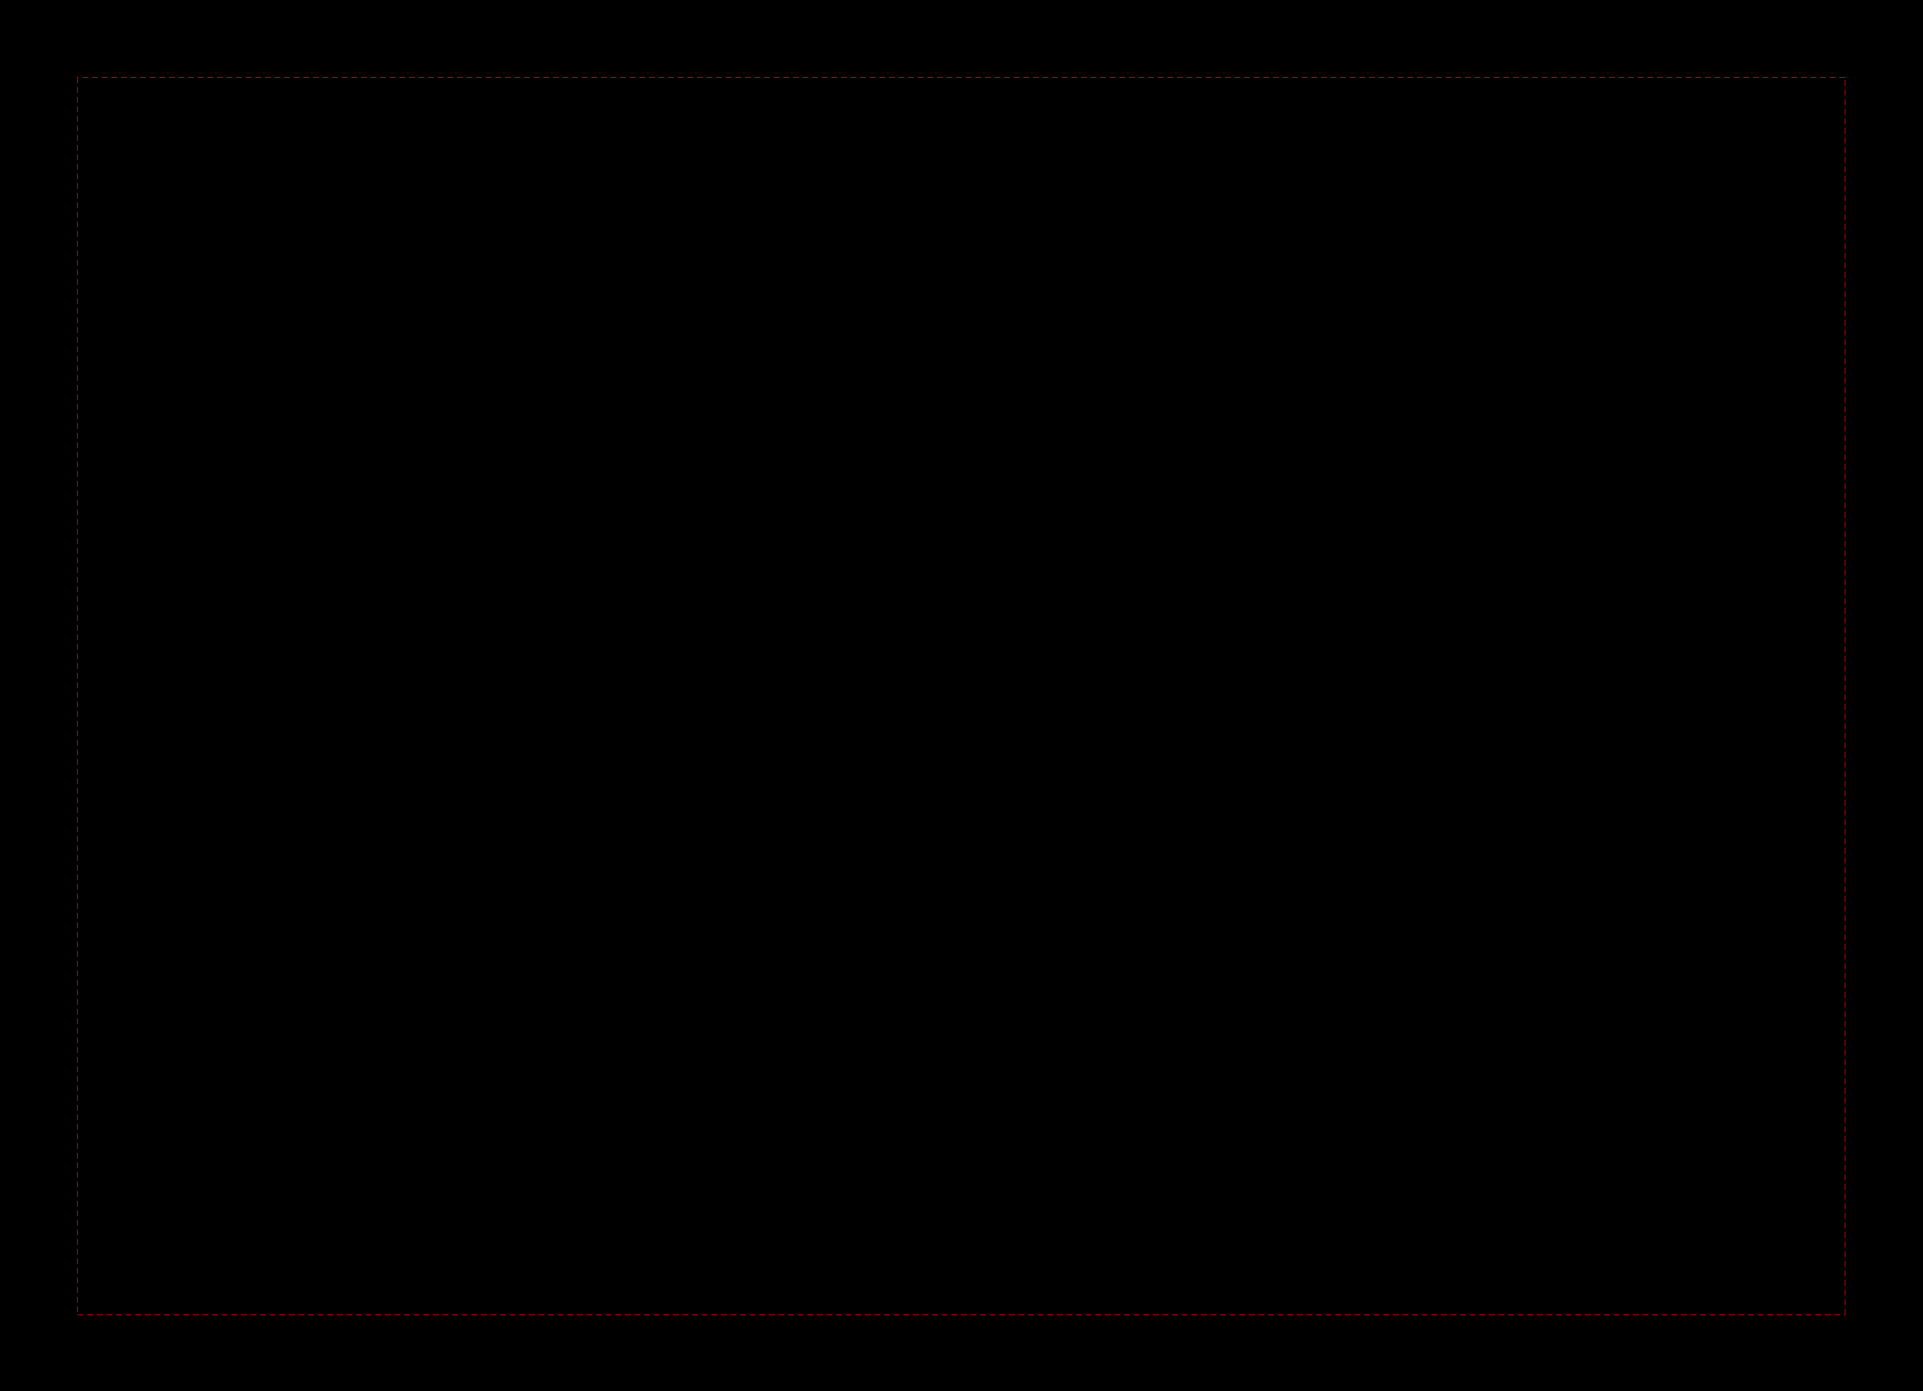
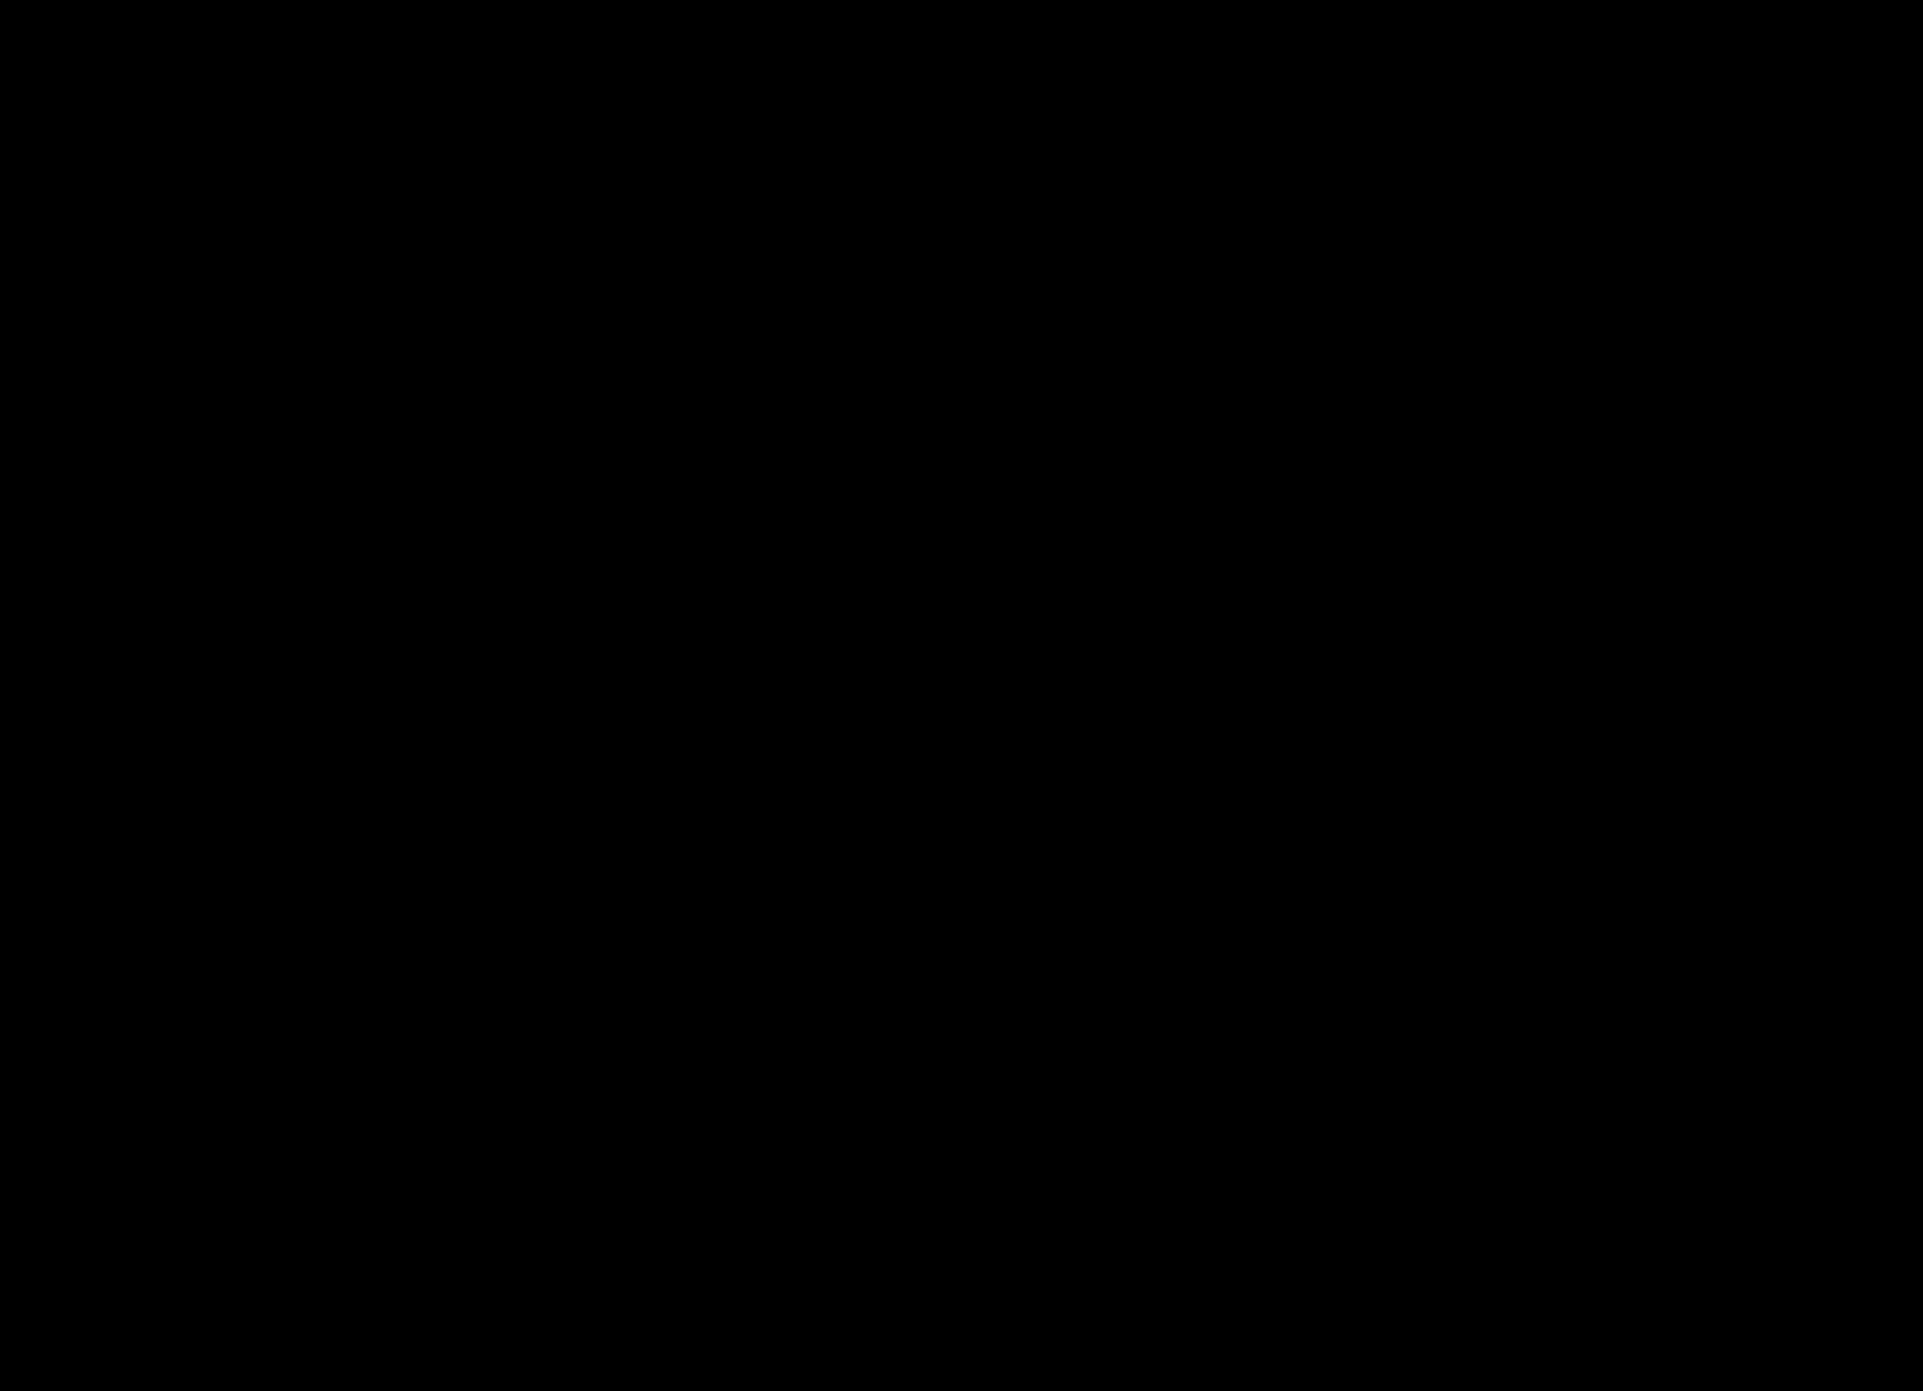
zone outline: (77, 77) (77, 1314) (1845, 1314) (1845, 77) (77, 77) -> none

